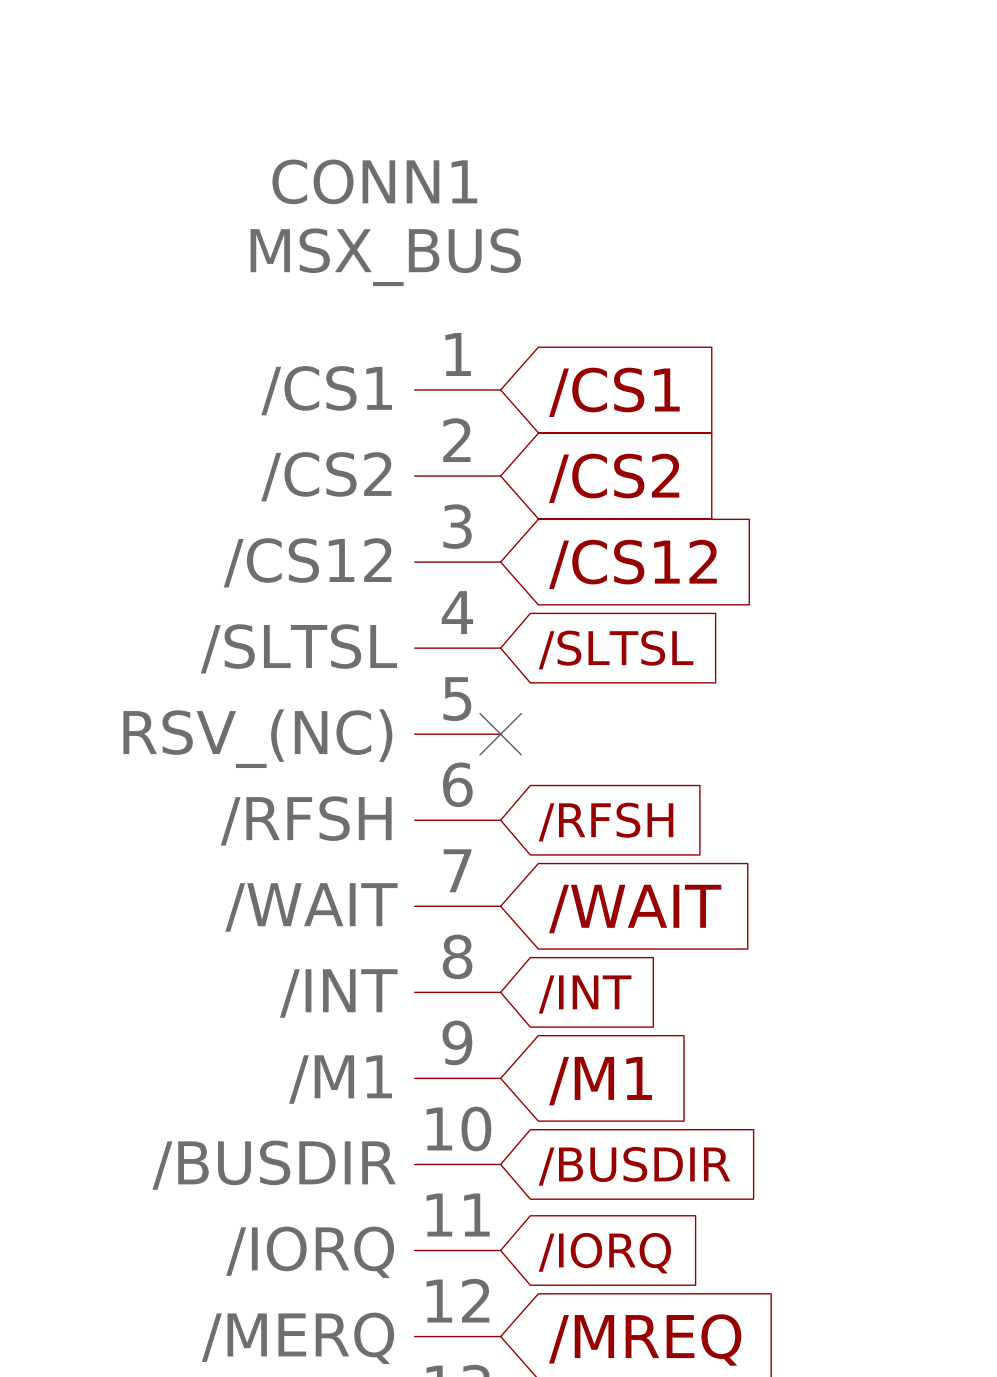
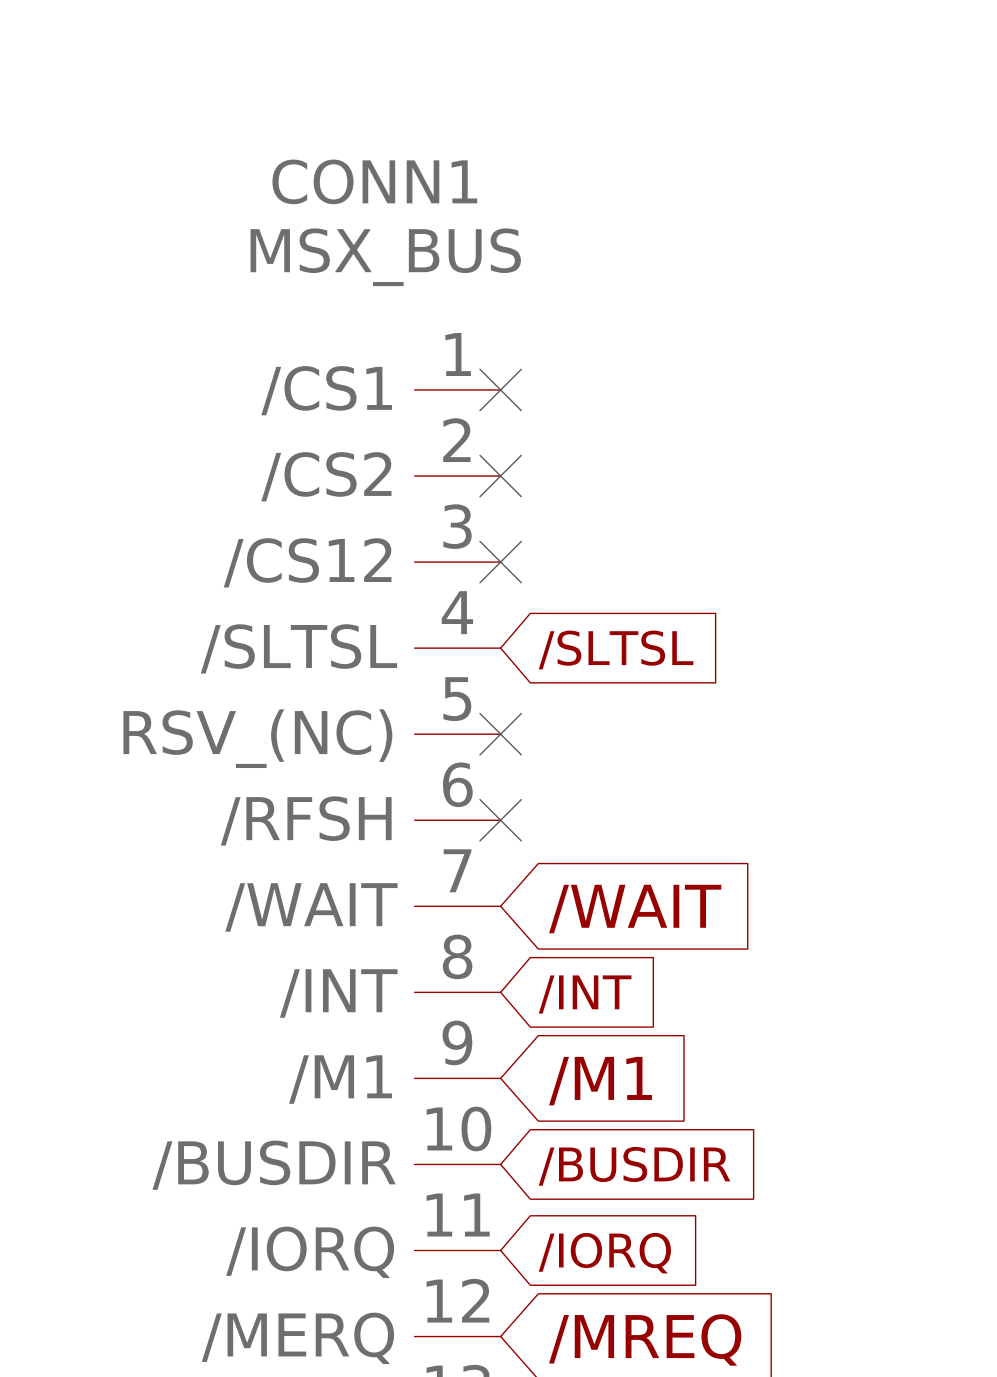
no-connect mark: none -> (500, 389)
global label: /CS1 (614, 392) -> none
no-connect mark: none -> (500, 476)
global label: /CS2 (614, 478) -> none
no-connect mark: none -> (500, 562)
global label: /CS12 (632, 564) -> none
no-connect mark: none -> (500, 820)
global label: /RFSH (606, 822) -> none

